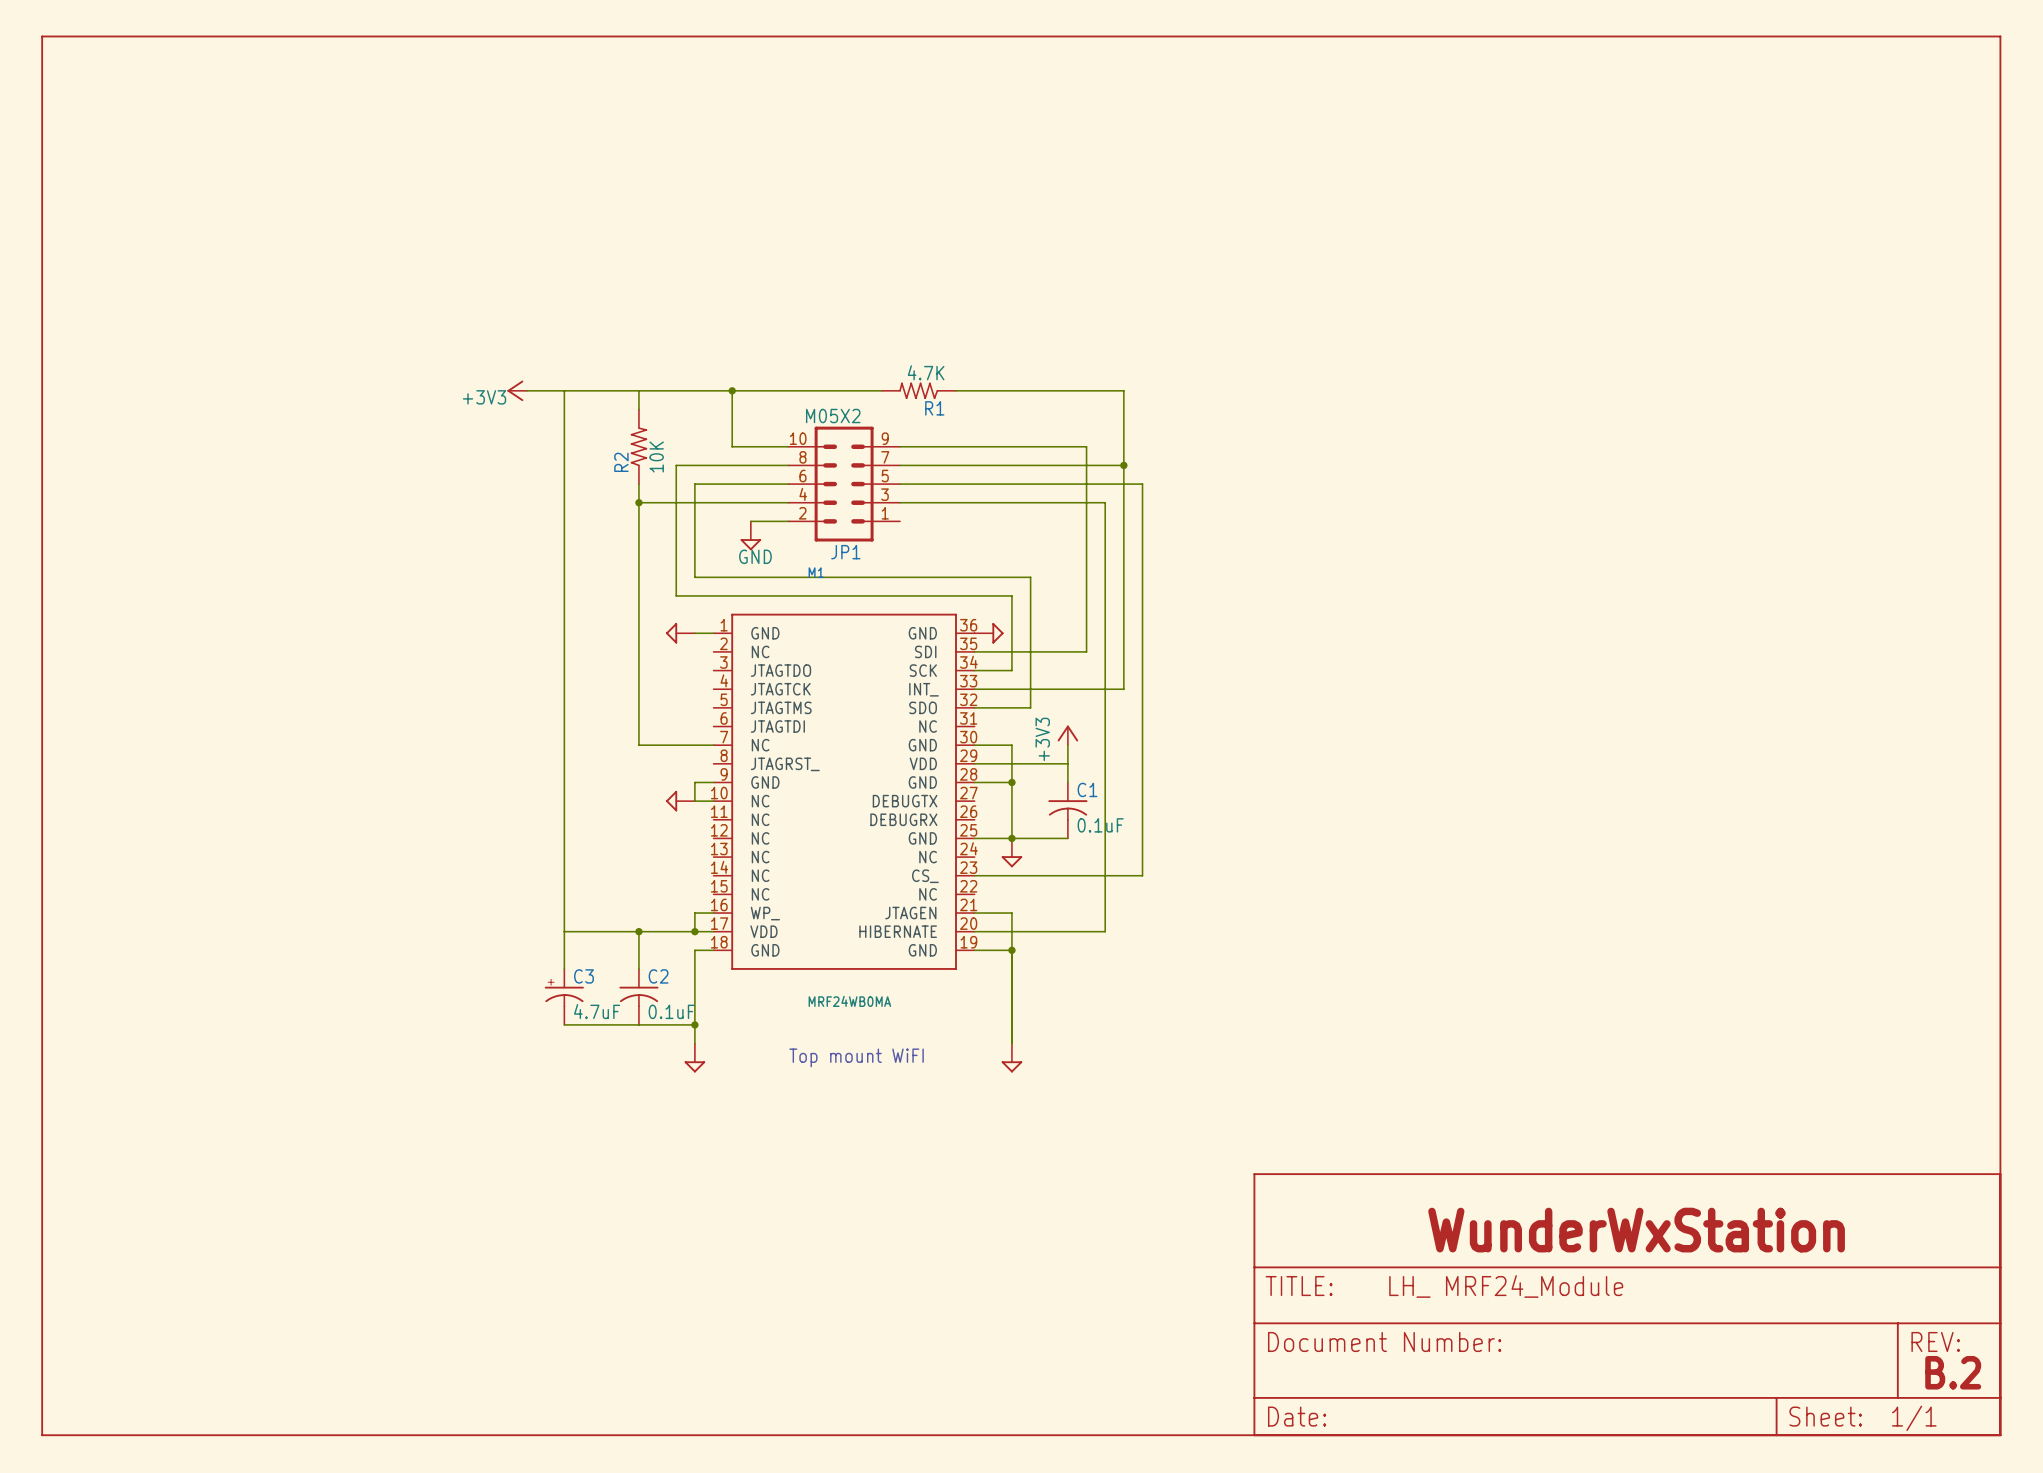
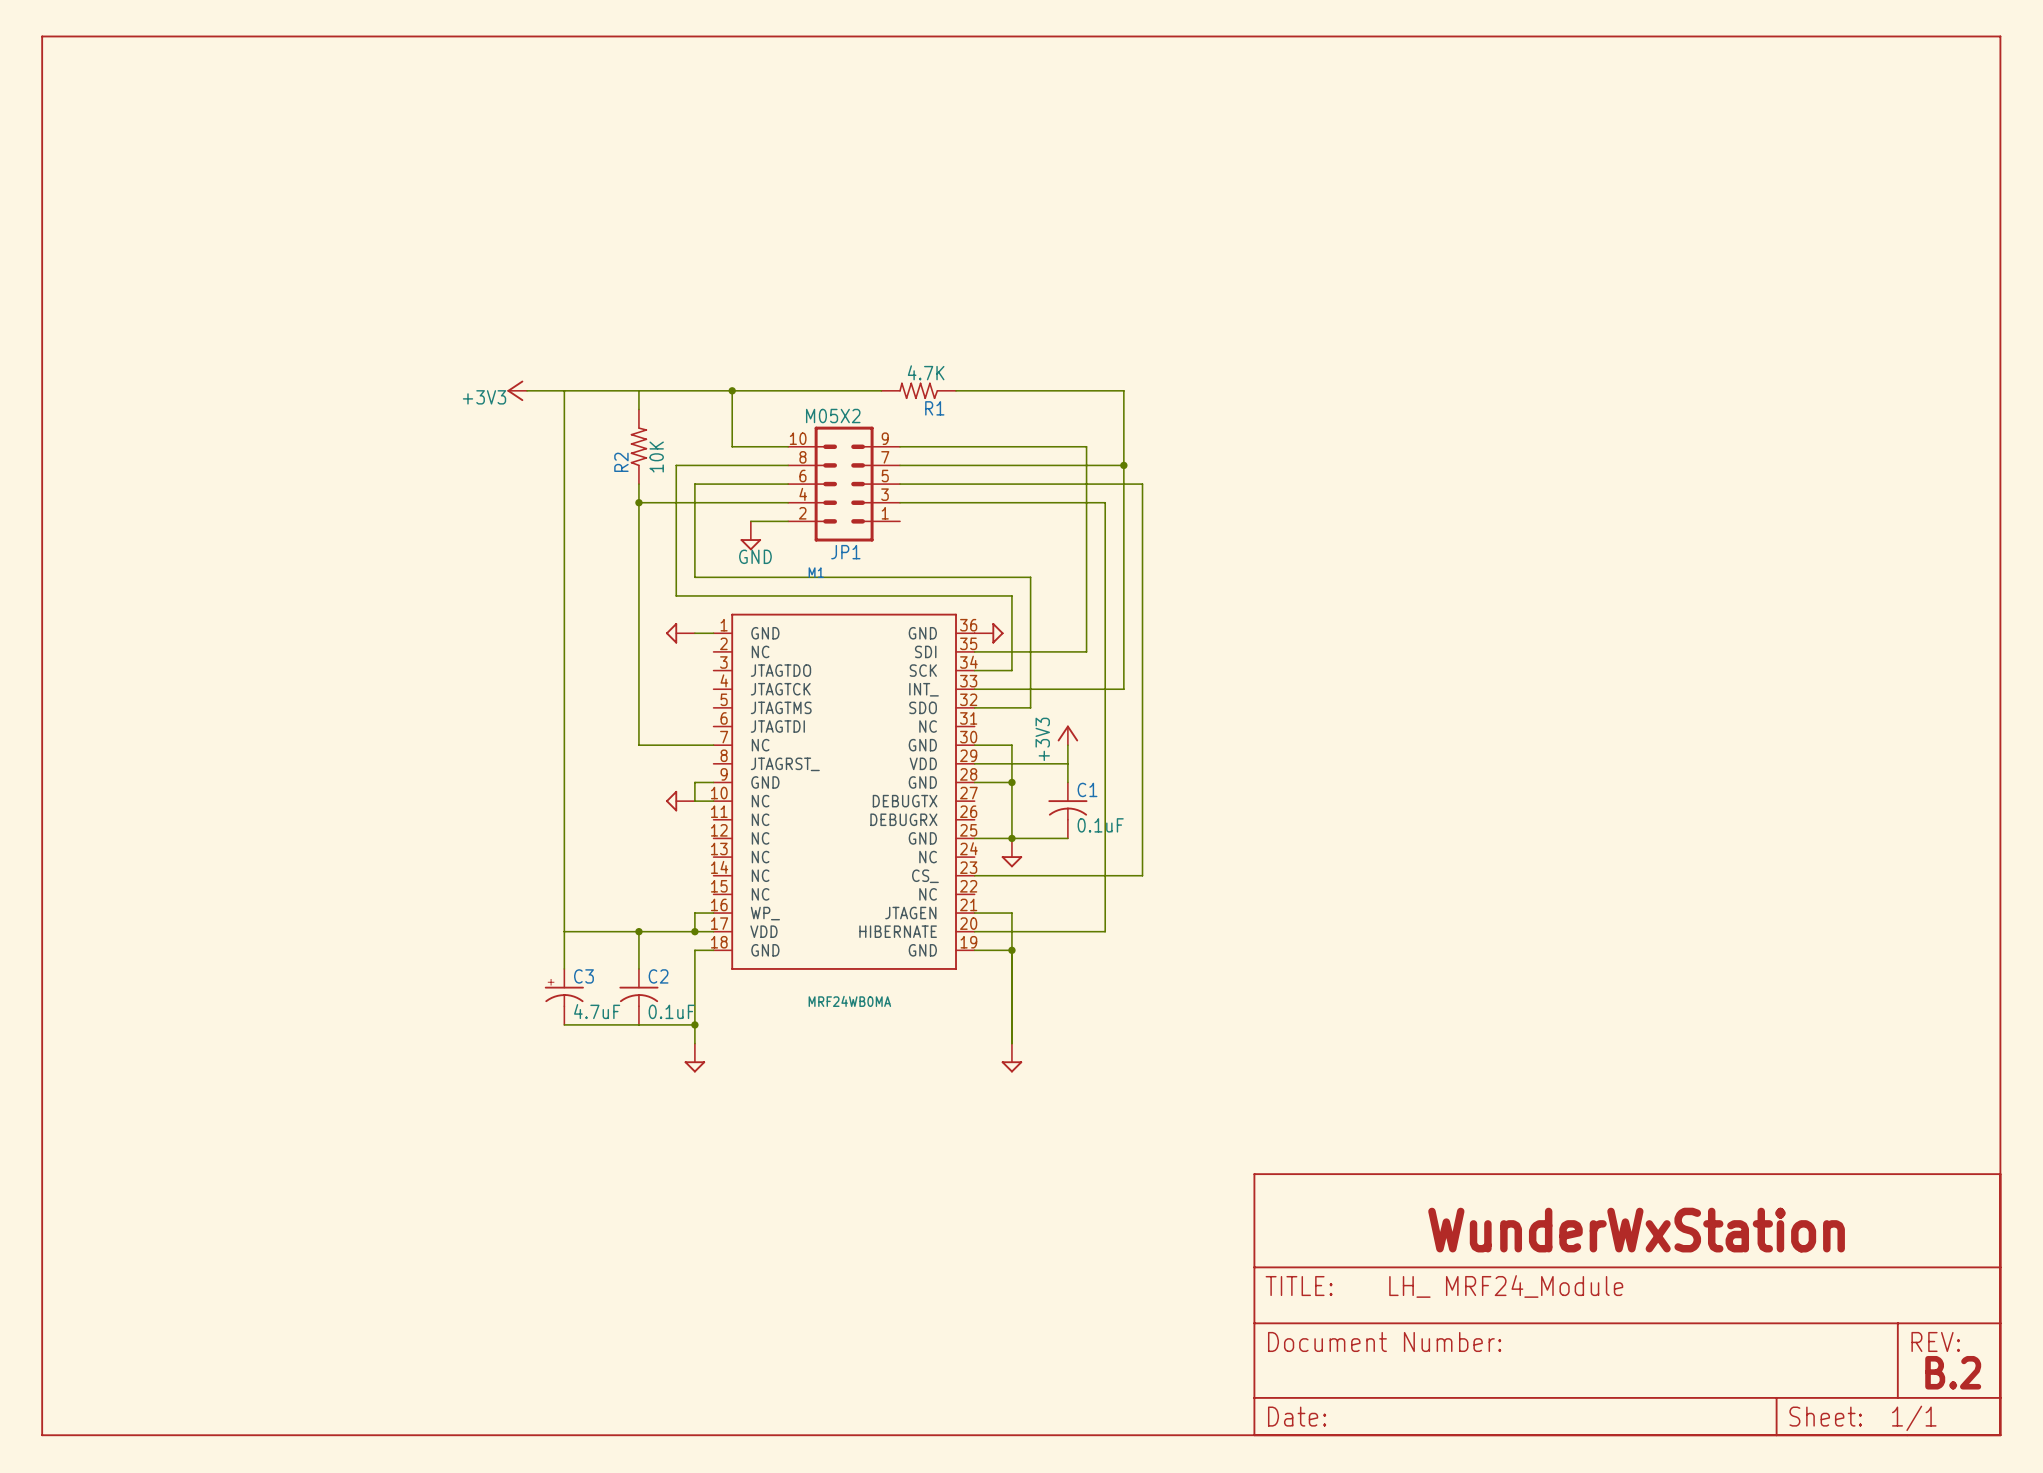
text: Top mount WiFI (856, 1057) -> none

